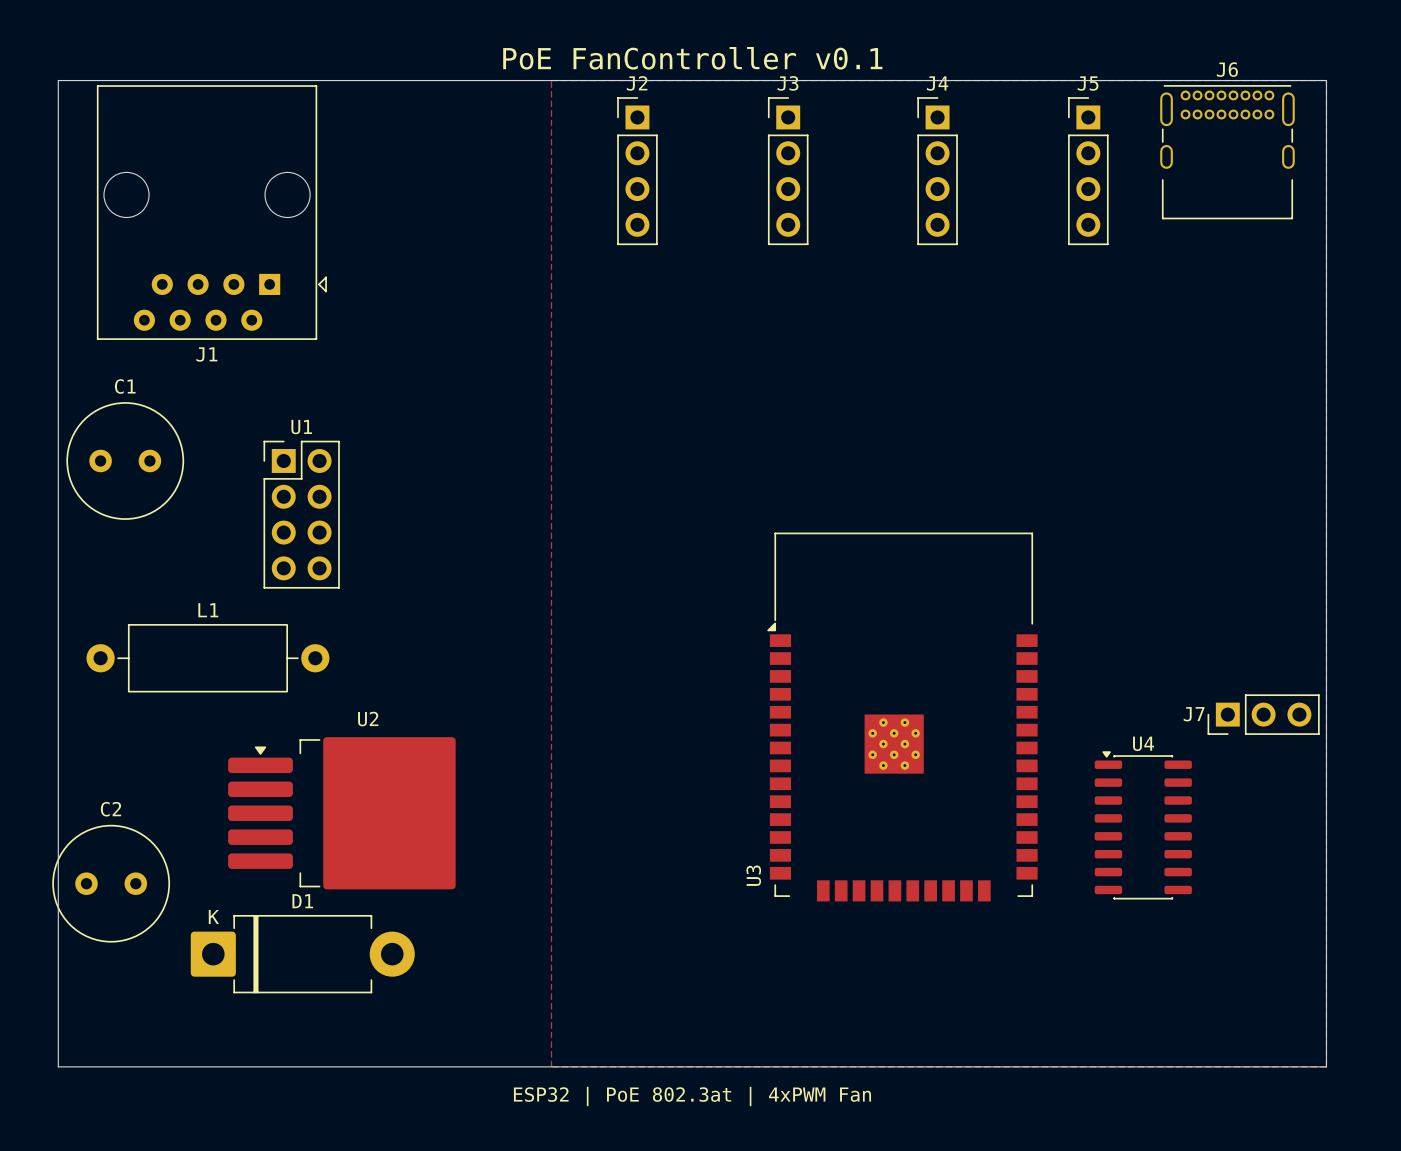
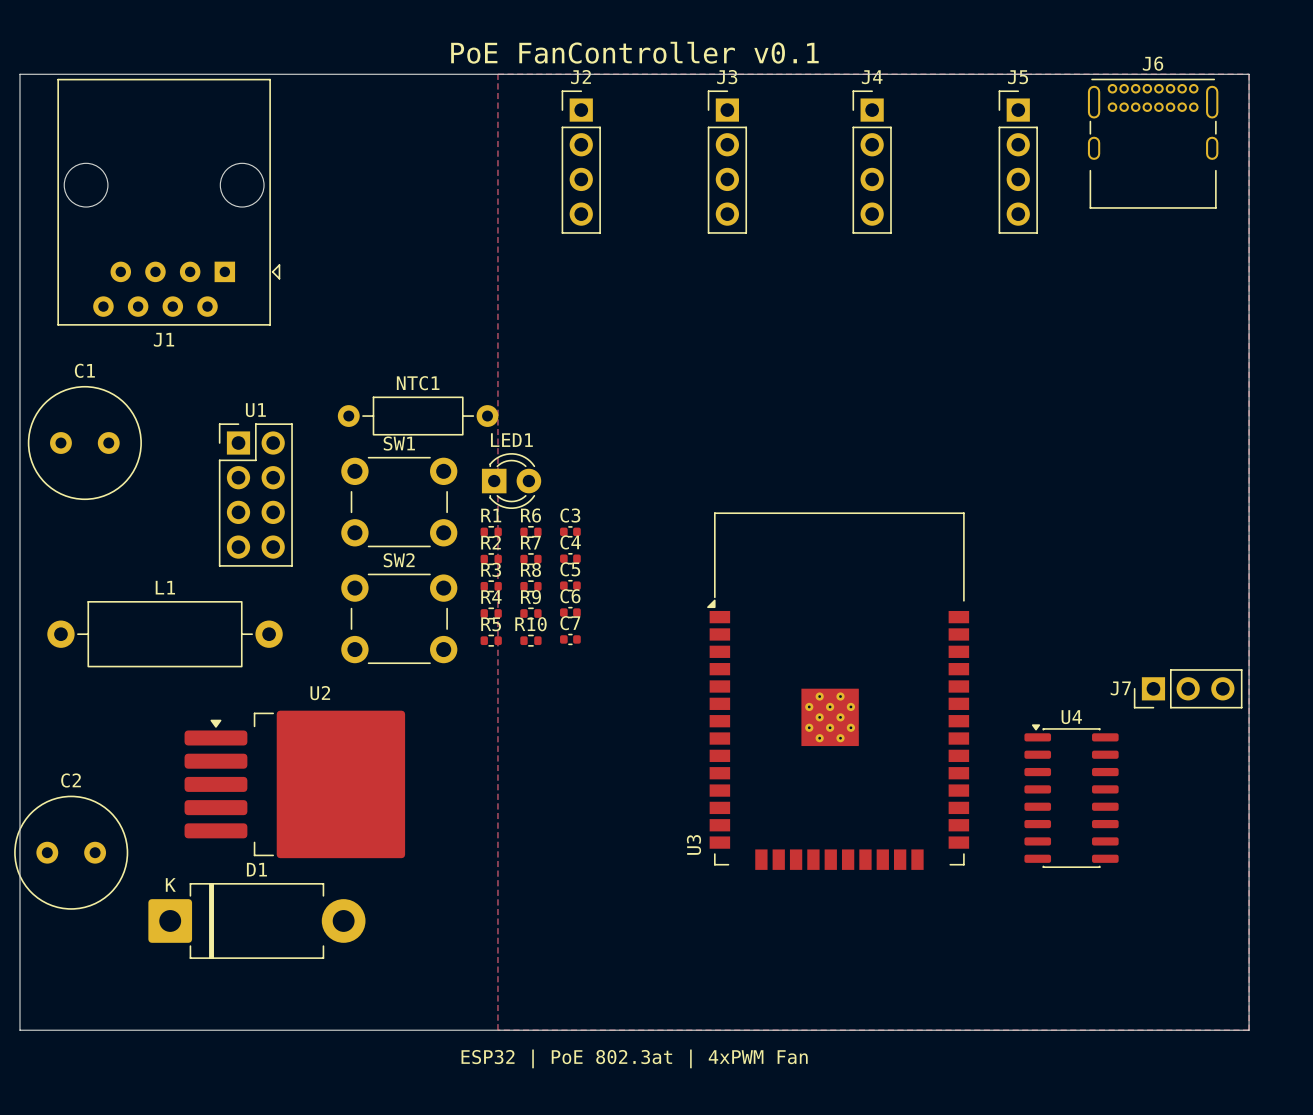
NTC1: none -> (418, 416)
LED1: none -> (511, 481)
SW1: none -> (399, 502)
R1: none -> (491, 531)
R6: none -> (530, 531)
C3: none -> (570, 531)
R2: none -> (491, 559)
R7: none -> (530, 559)
C4: none -> (570, 558)
R3: none -> (491, 586)
R8: none -> (530, 586)
C5: none -> (570, 585)
C6: none -> (570, 612)
R4: none -> (491, 613)
R9: none -> (530, 613)
SW2: none -> (399, 618)
C7: none -> (570, 639)
R5: none -> (491, 640)
R10: none -> (530, 640)

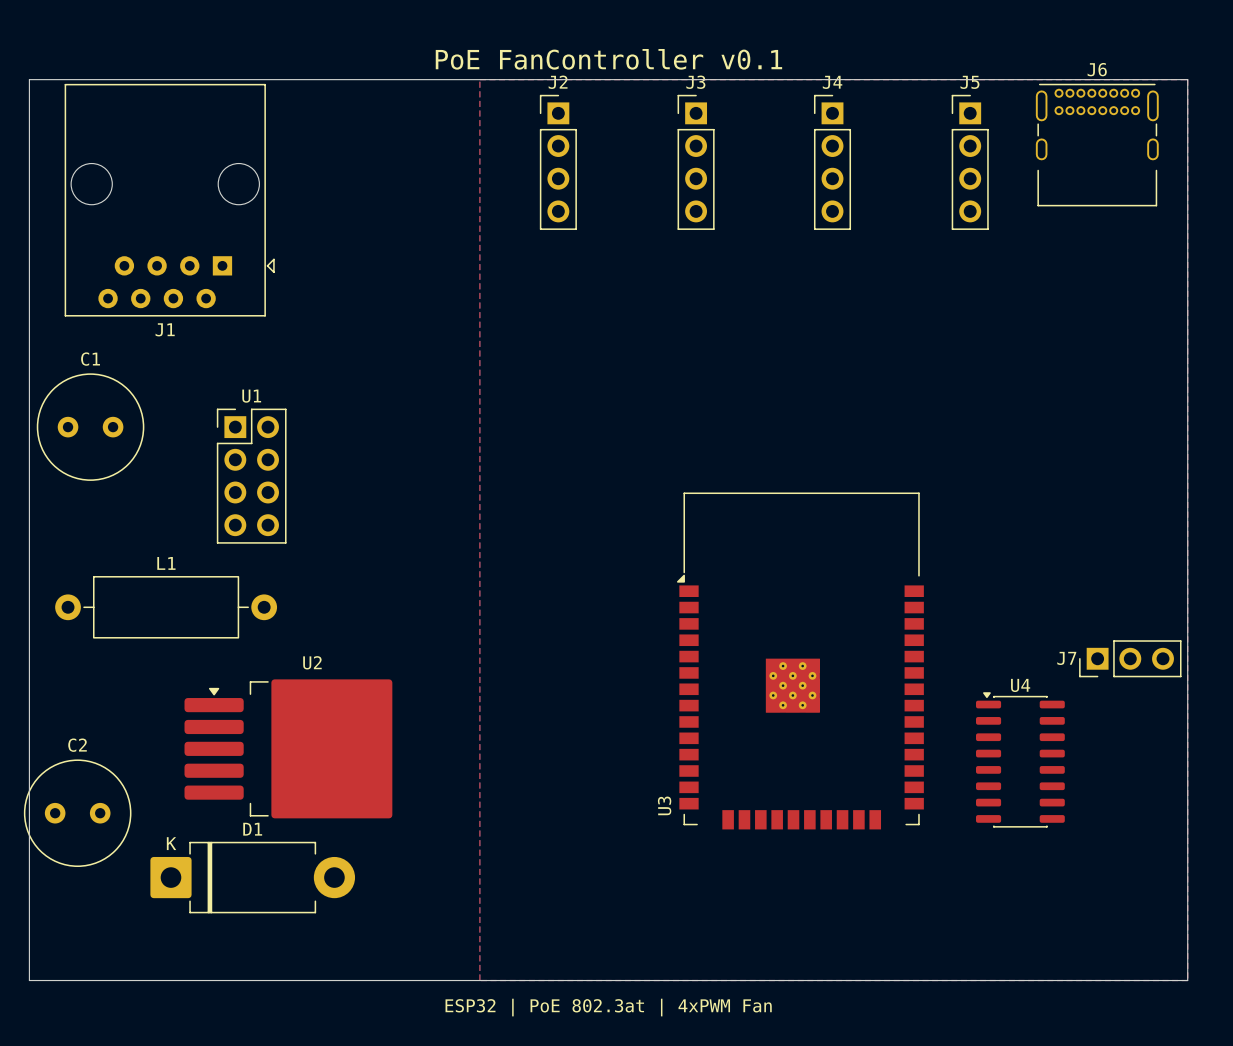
NTC1: (418, 416) -> none
LED1: (511, 481) -> none
SW1: (399, 502) -> none
R1: (491, 531) -> none
R6: (530, 531) -> none
C3: (570, 531) -> none
C4: (570, 558) -> none
R2: (491, 559) -> none
R7: (530, 559) -> none
C5: (570, 585) -> none
R3: (491, 586) -> none
R8: (530, 586) -> none
C6: (570, 612) -> none
R4: (491, 613) -> none
R9: (530, 613) -> none
SW2: (399, 618) -> none
C7: (570, 639) -> none
R5: (491, 640) -> none
R10: (530, 640) -> none

